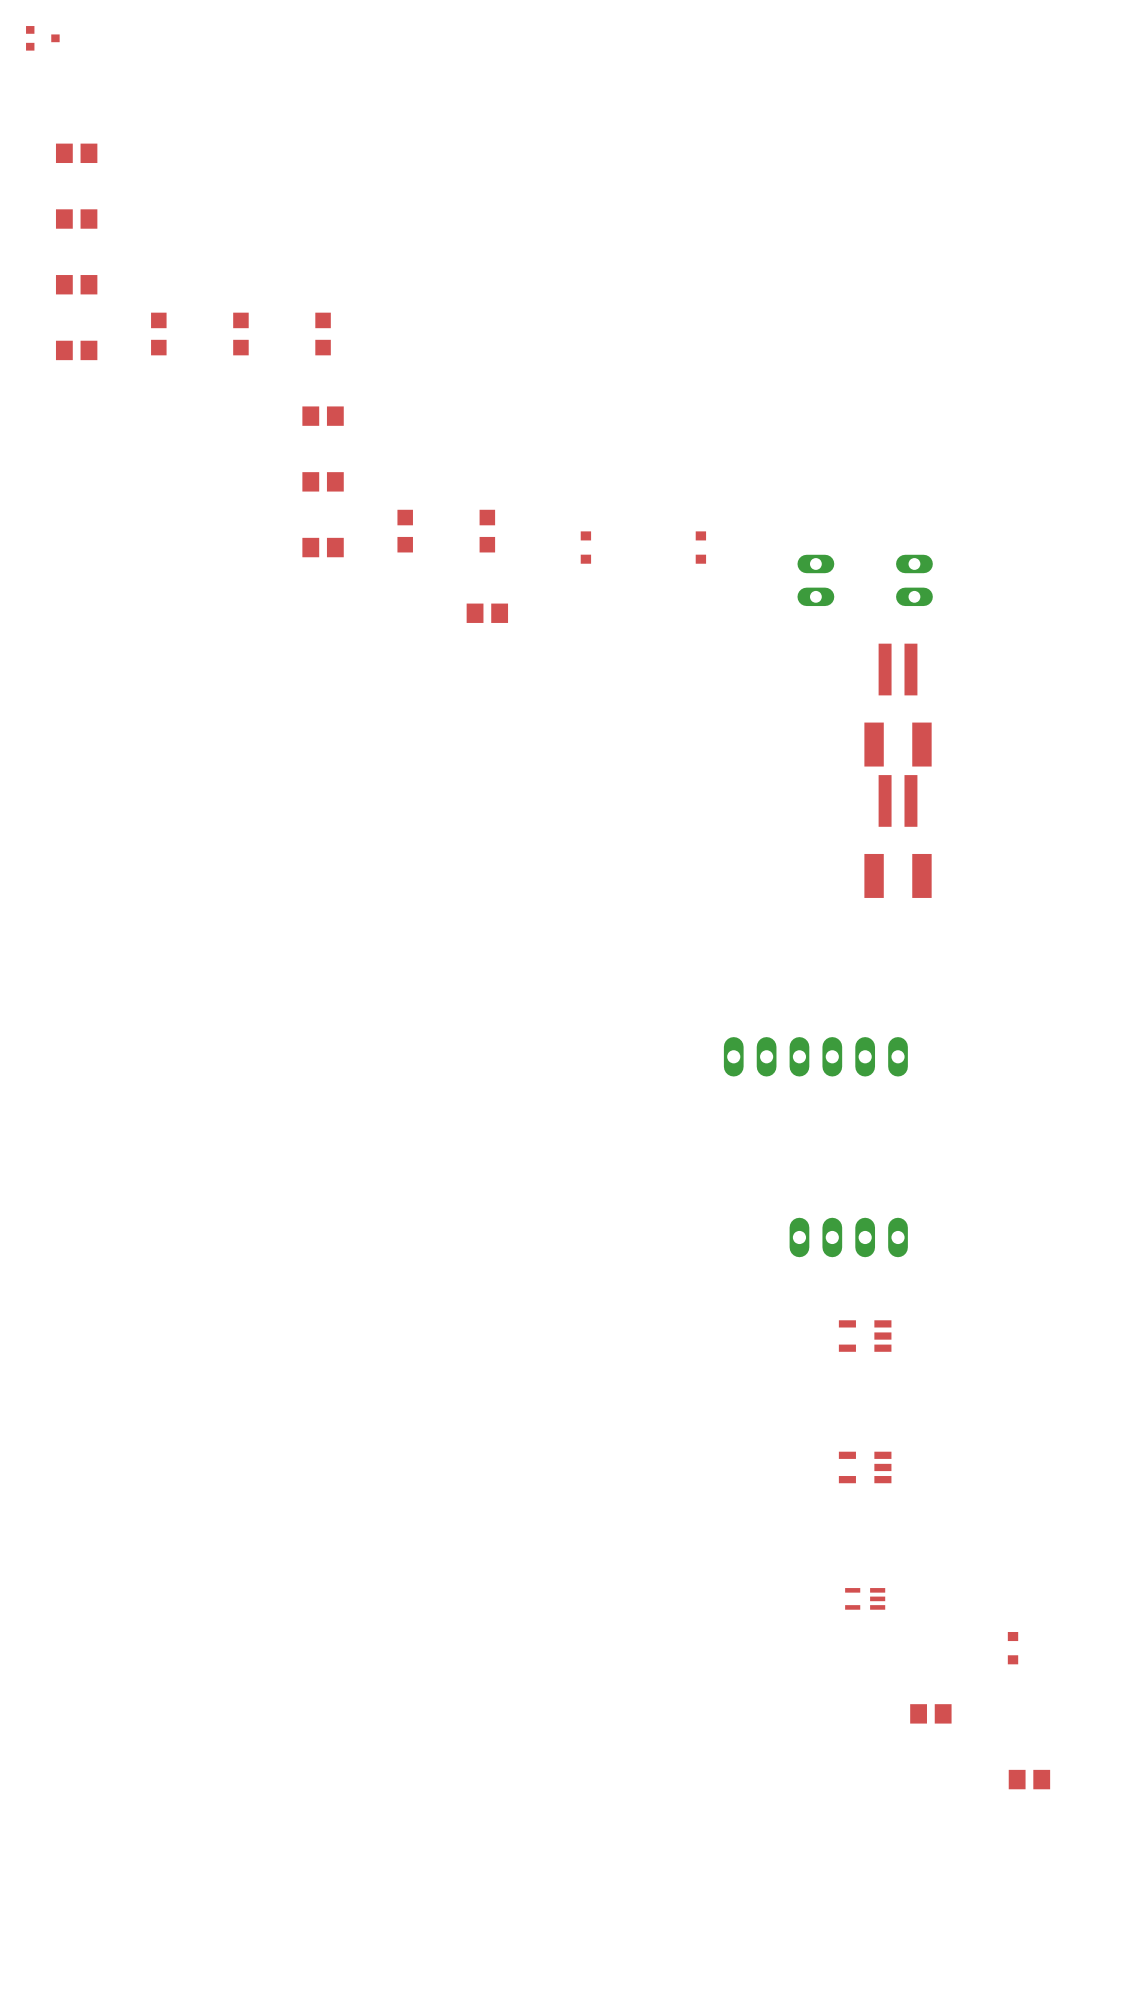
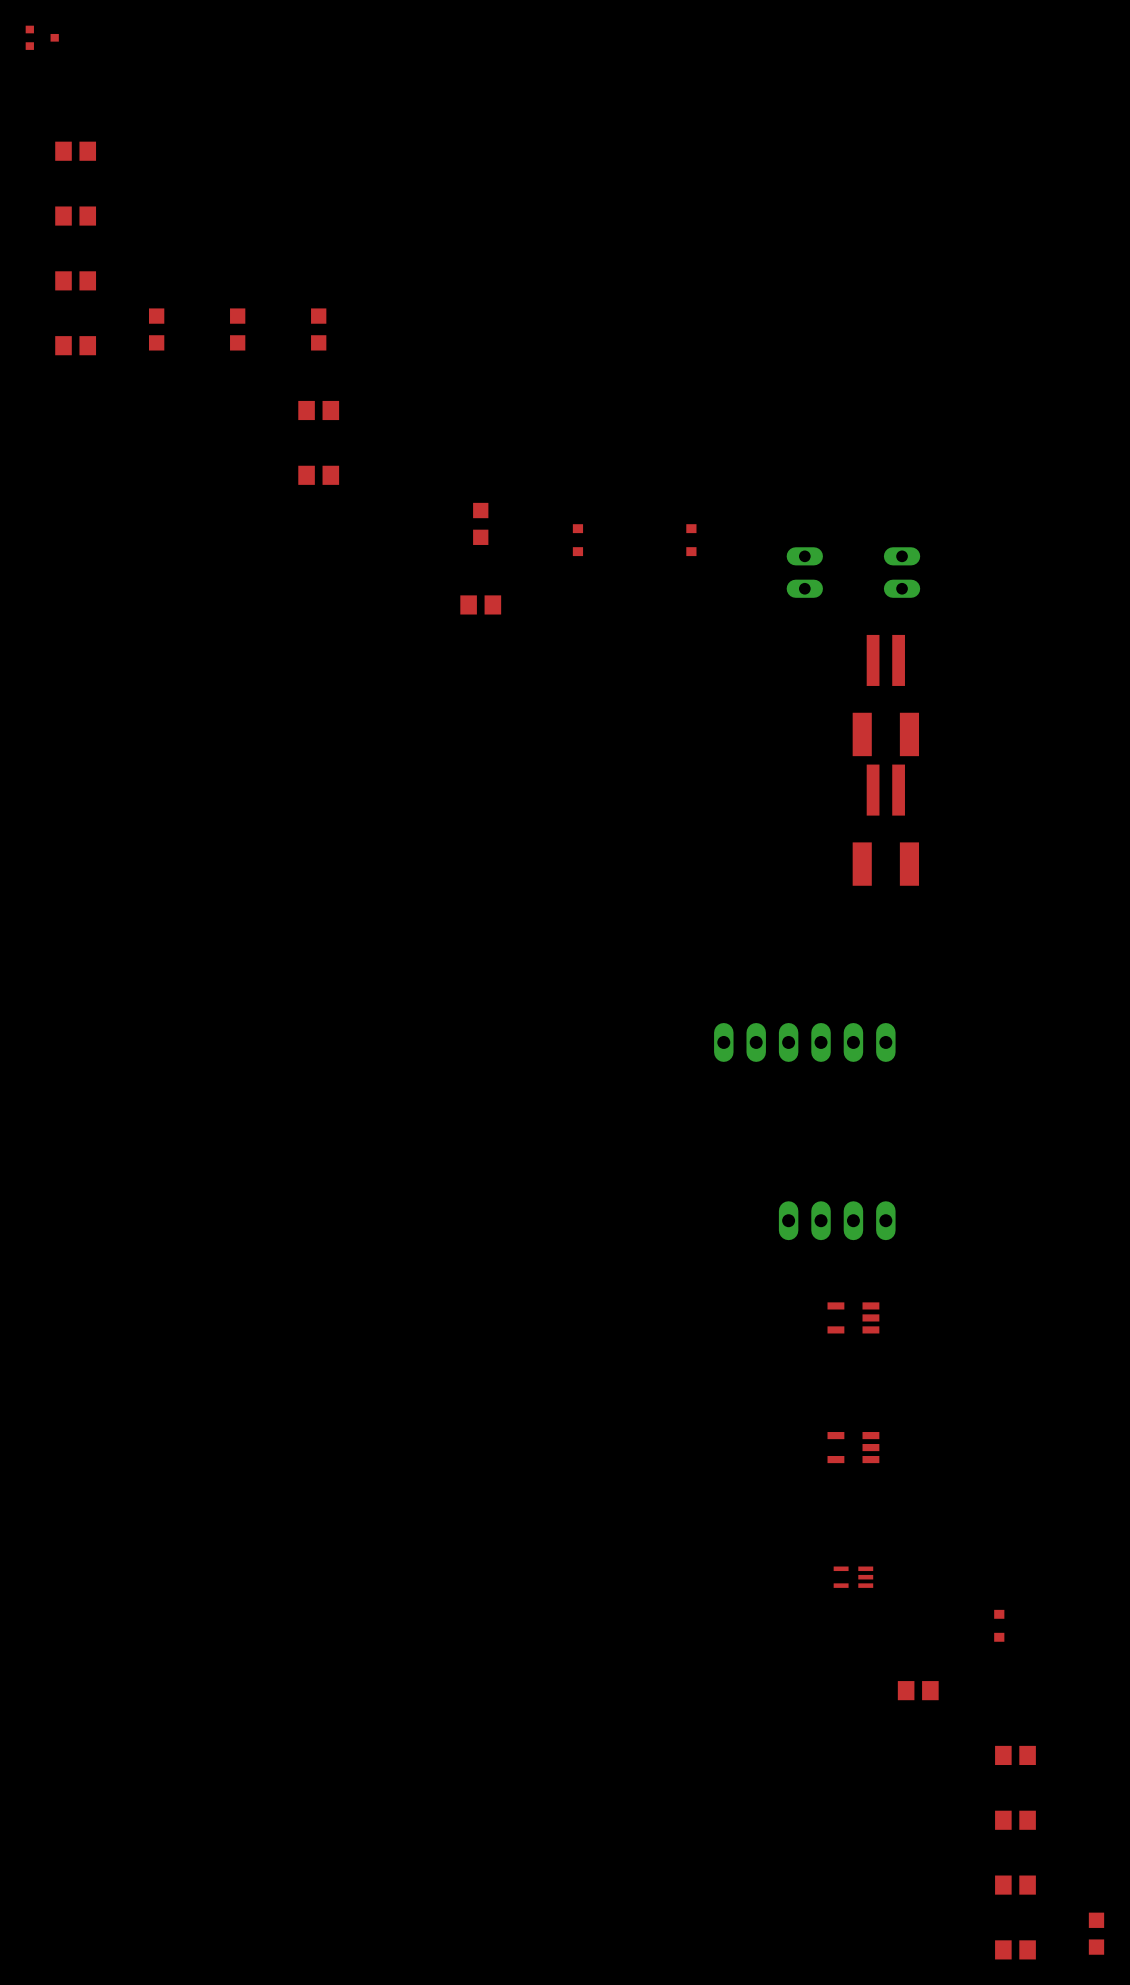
part: (405, 531) -> none
part: (323, 547) -> none
part: none -> (1015, 1820)
part: none -> (1015, 1885)
part: none -> (1096, 1933)
part: none -> (1015, 1949)

